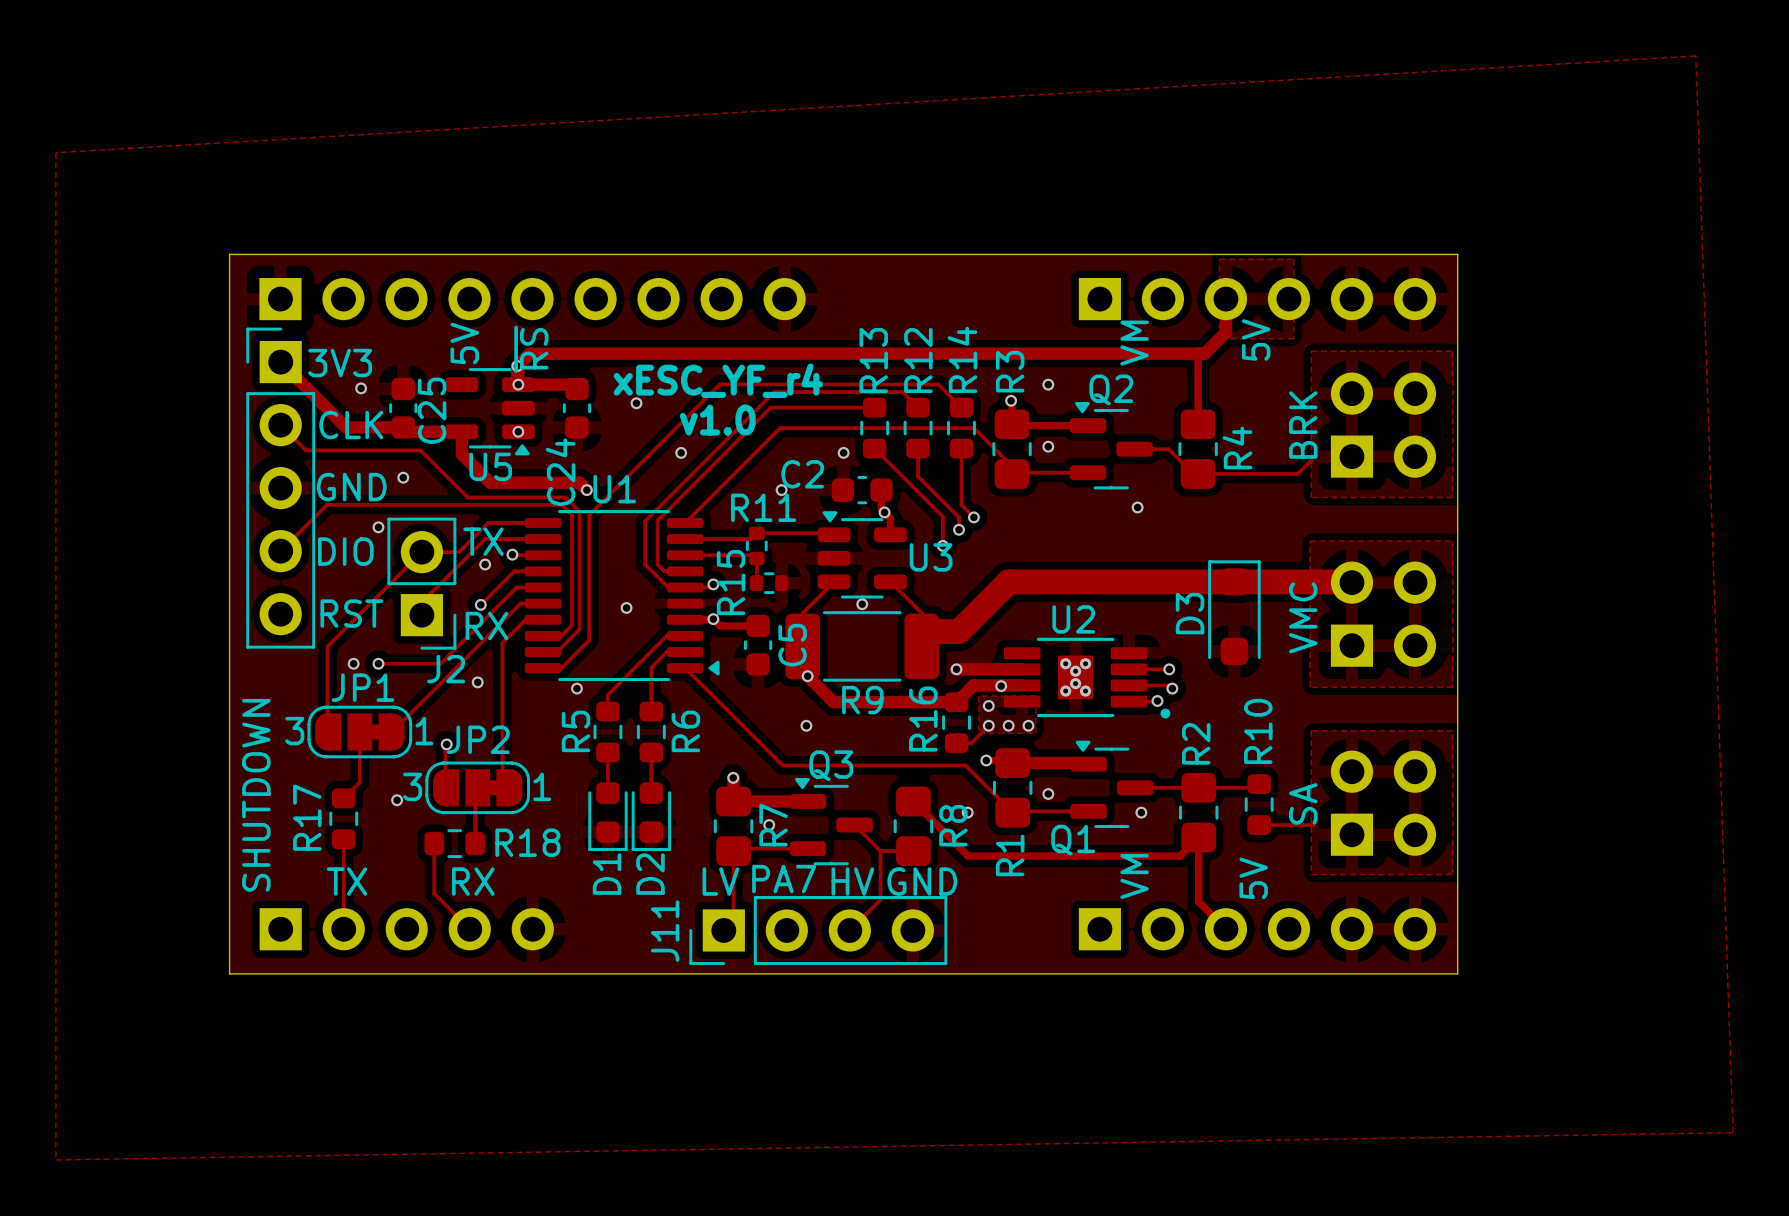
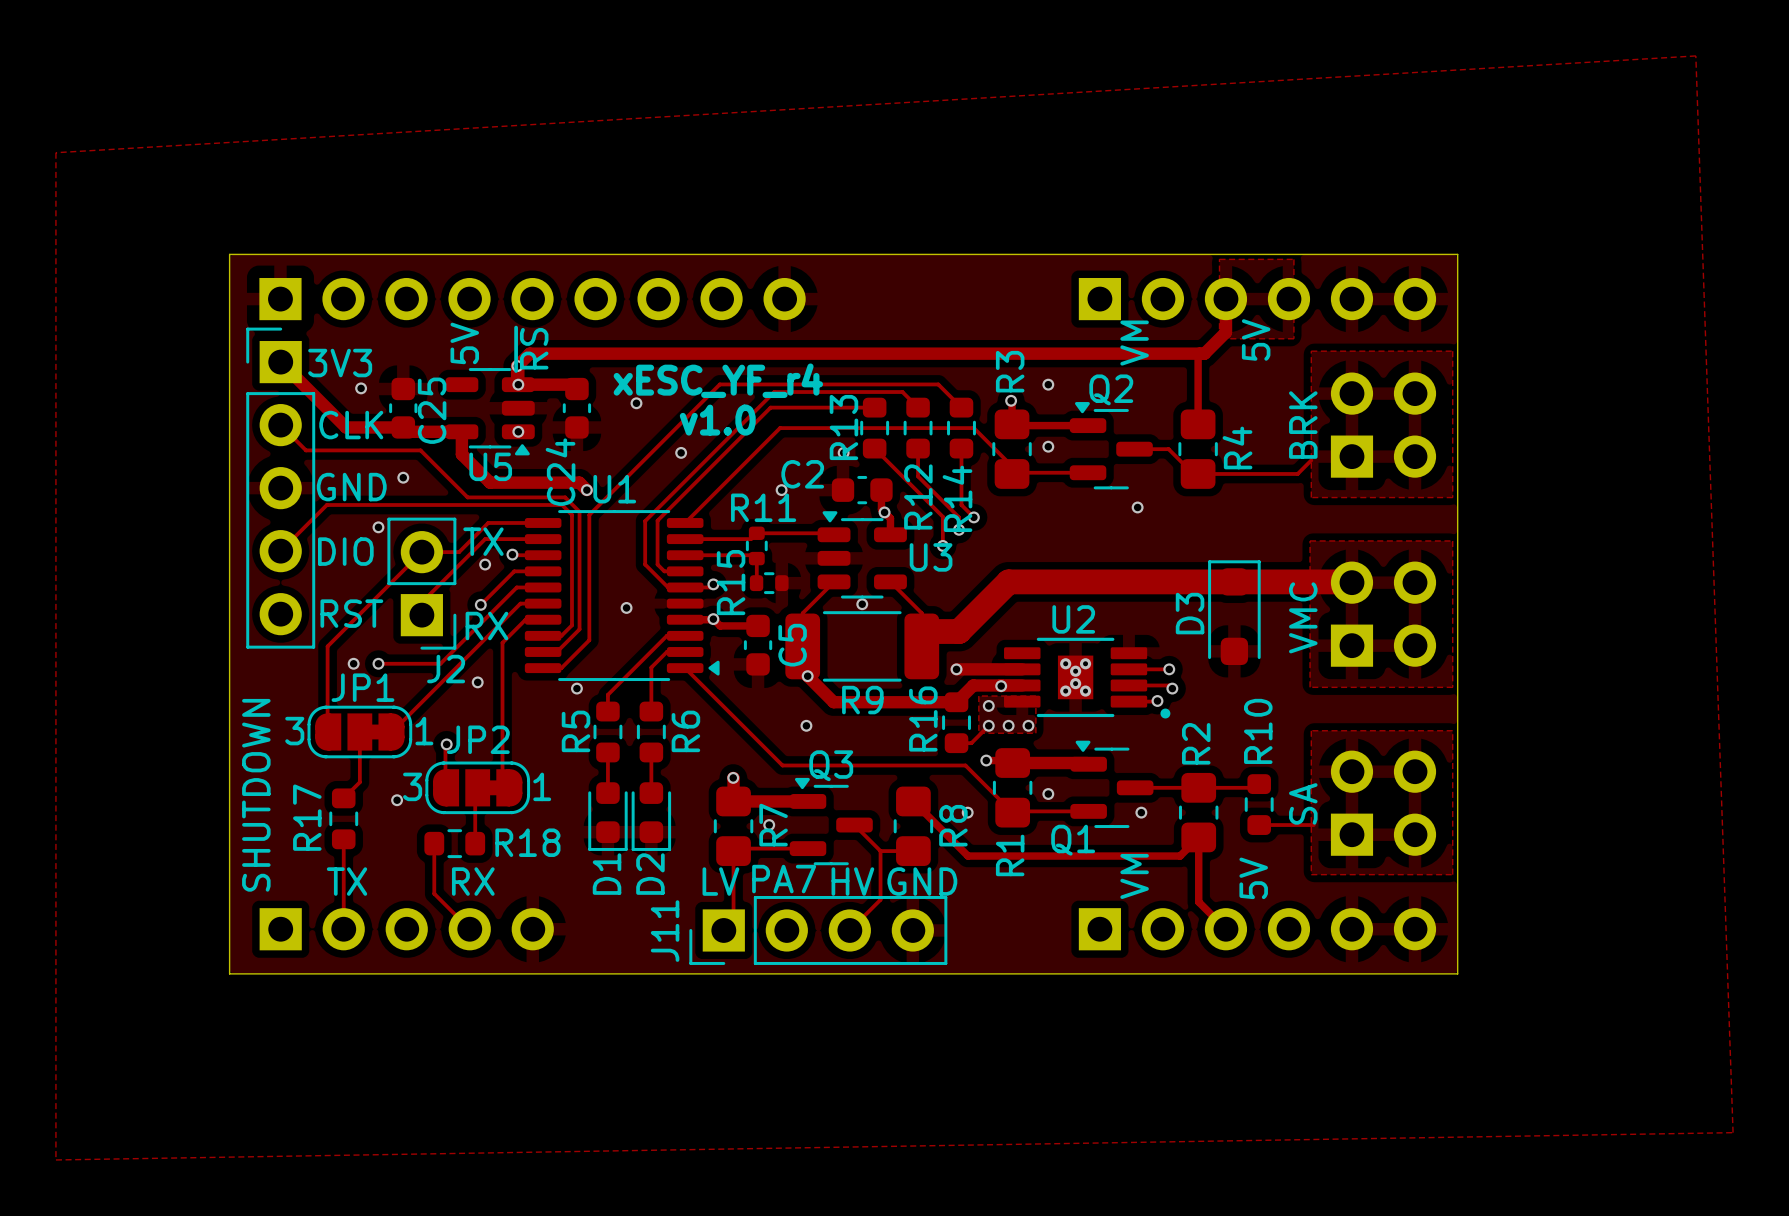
R14 name position: R14 (962, 359) -> R14 (957, 498)
R13 name position: R13 (873, 360) -> R13 (843, 427)
R12 name position: R12 (918, 360) -> R12 (918, 496)

